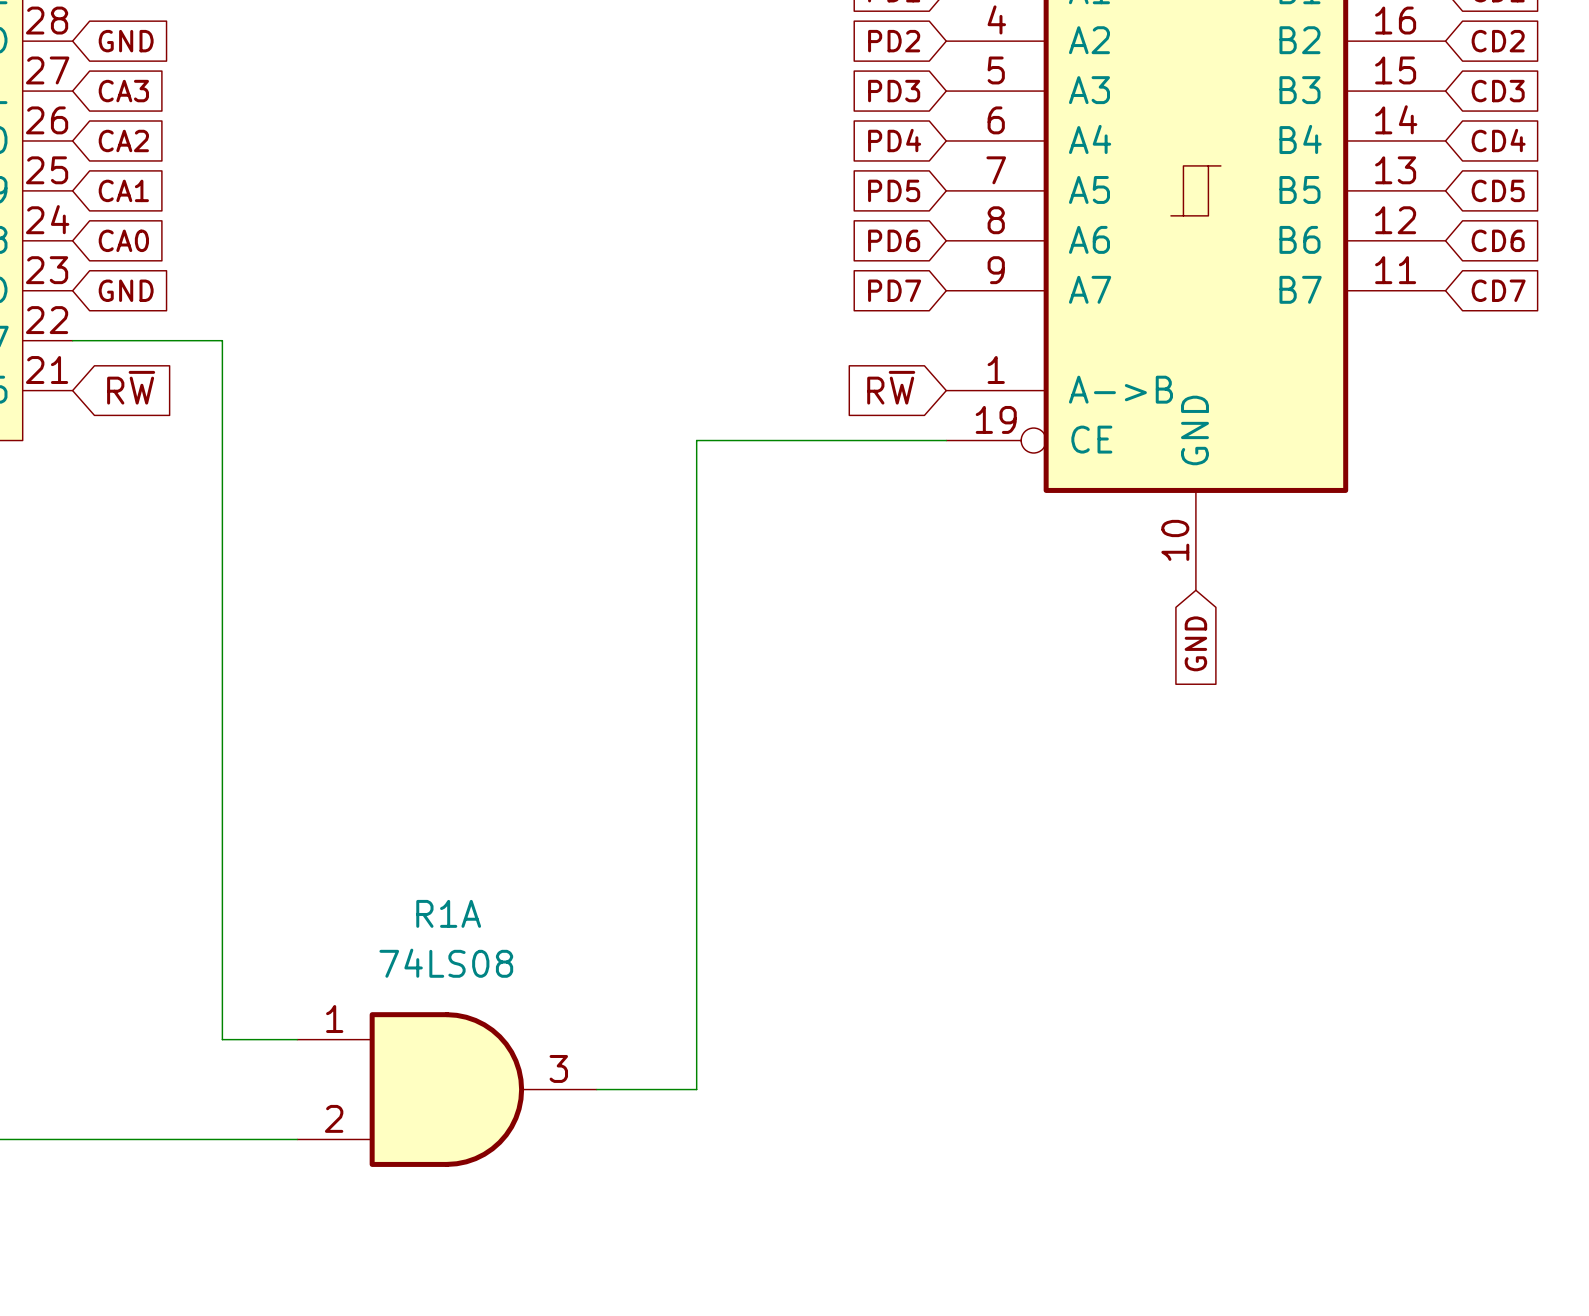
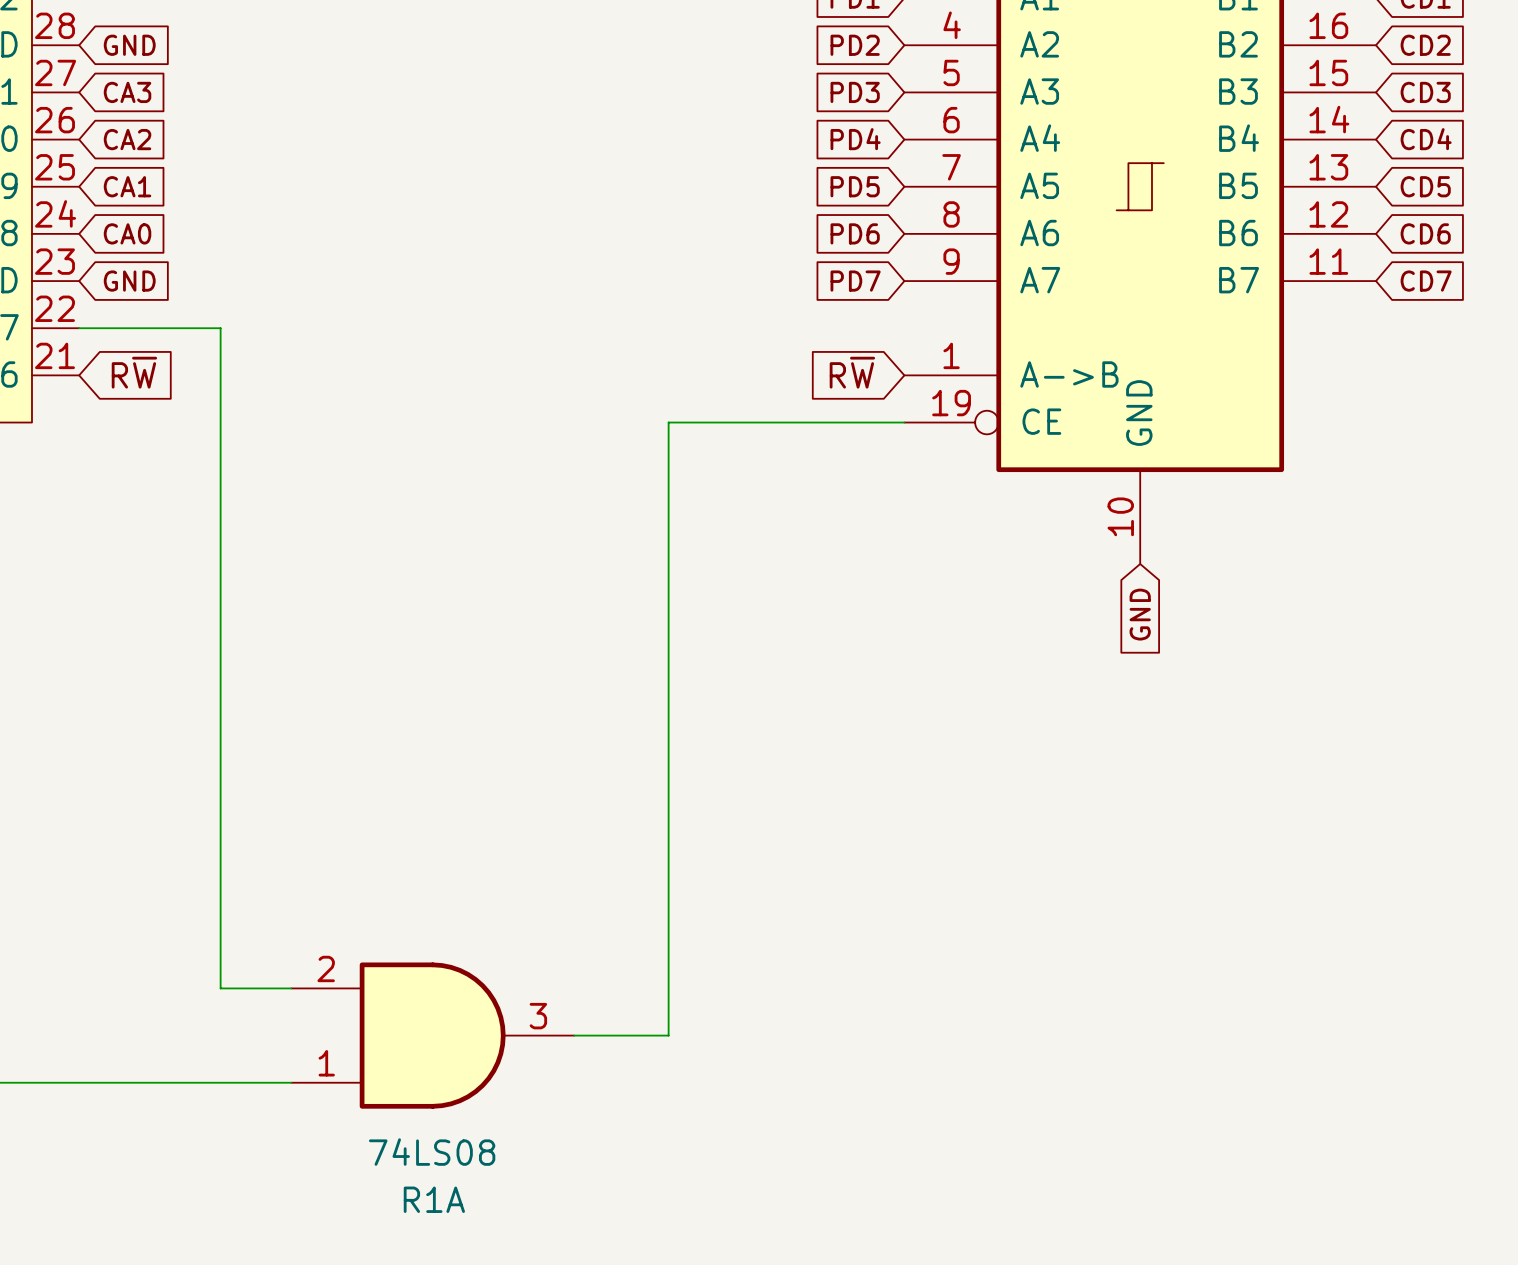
R1A flip: as is (446, 1089) -> up-down (432, 1035)

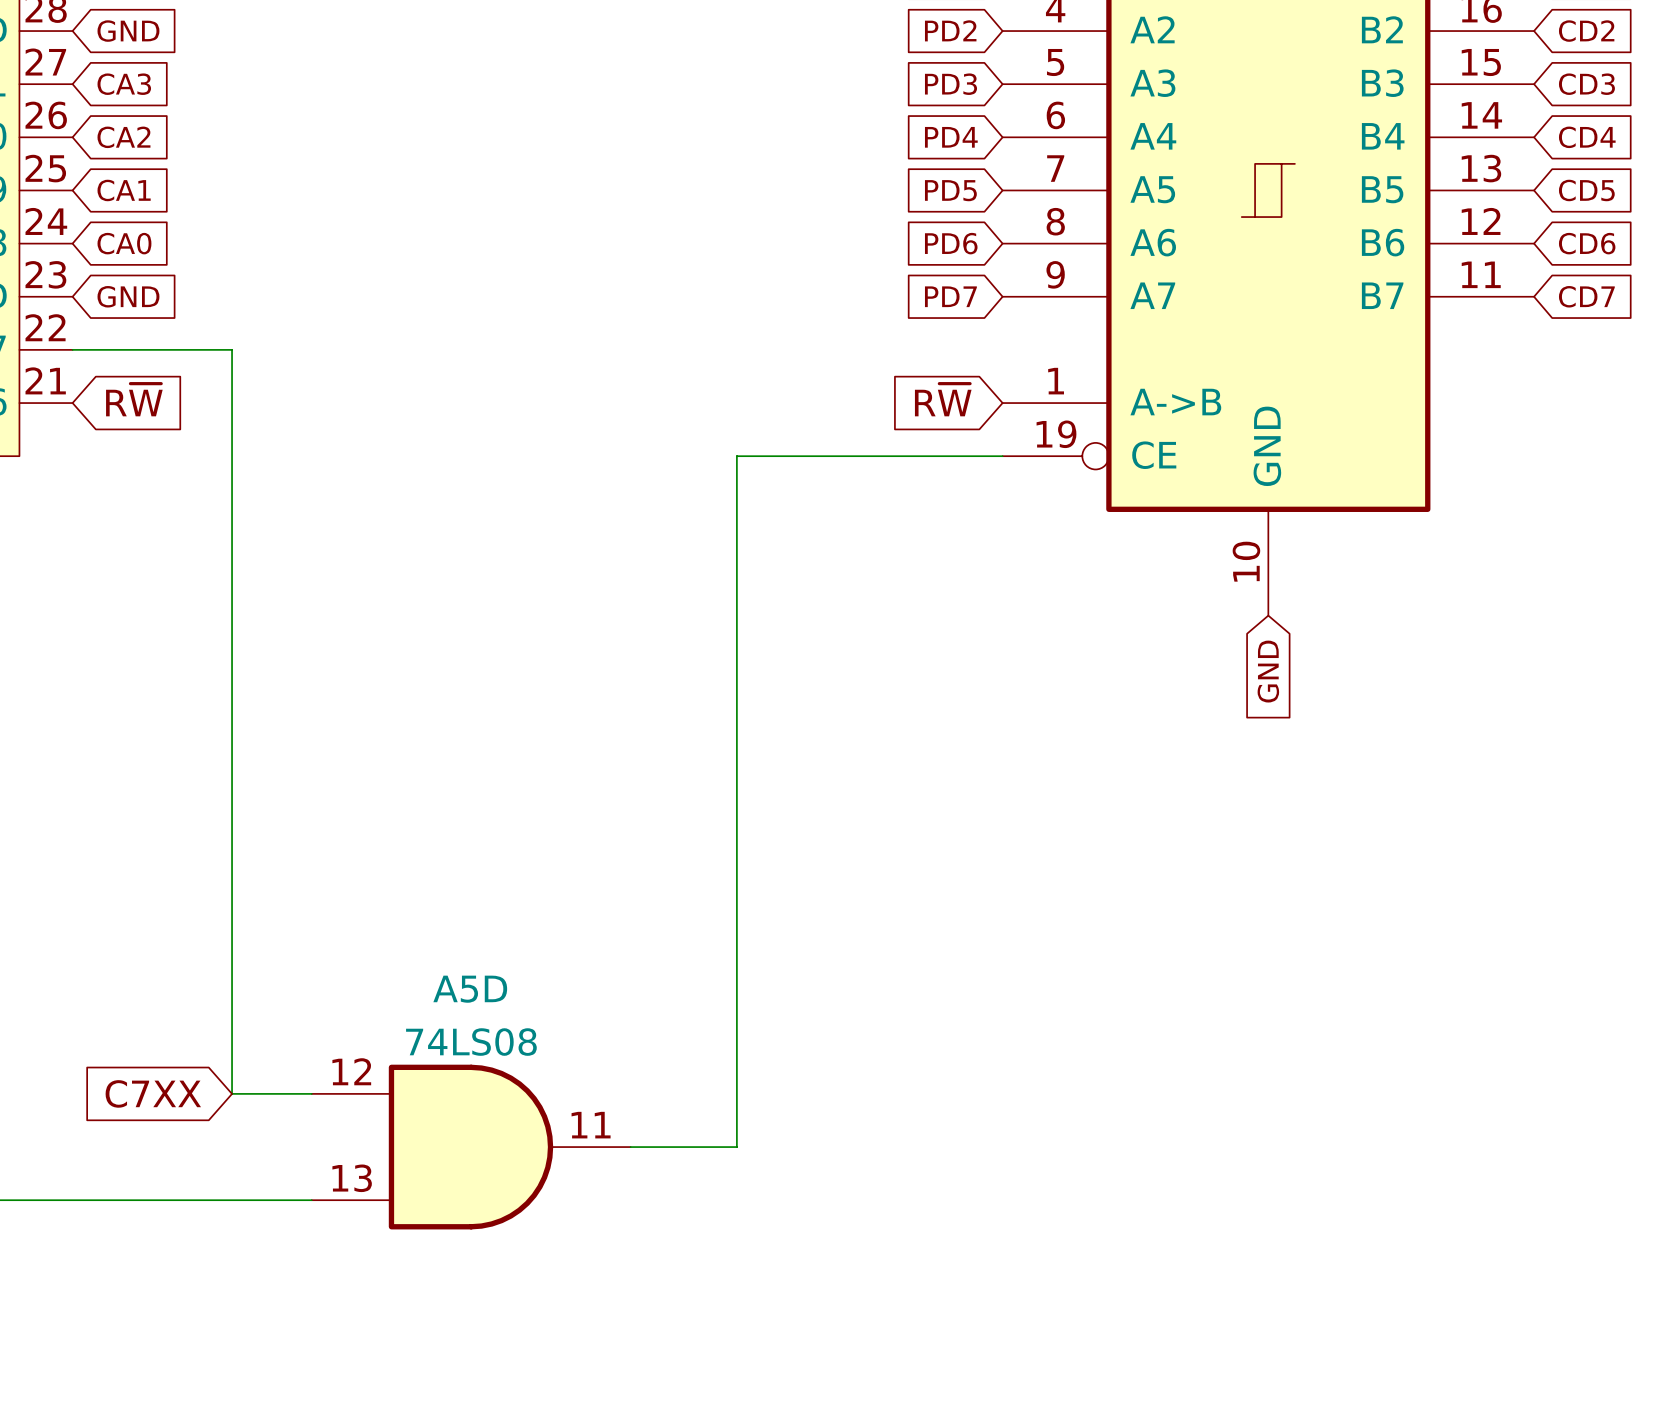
R1A pin number: 2 (326, 968) -> 12 (351, 1071)
global label: none -> C7XX (153, 1093)
R1A pin number: 3 (538, 1016) -> 11 (591, 1125)
R1A pin number: 1 (326, 1063) -> 13 (352, 1178)
R1A value position: 74LS08 (432, 1152) -> 74LS08 (471, 1042)
R1A name: R1A (434, 1199) -> A5D (470, 989)

